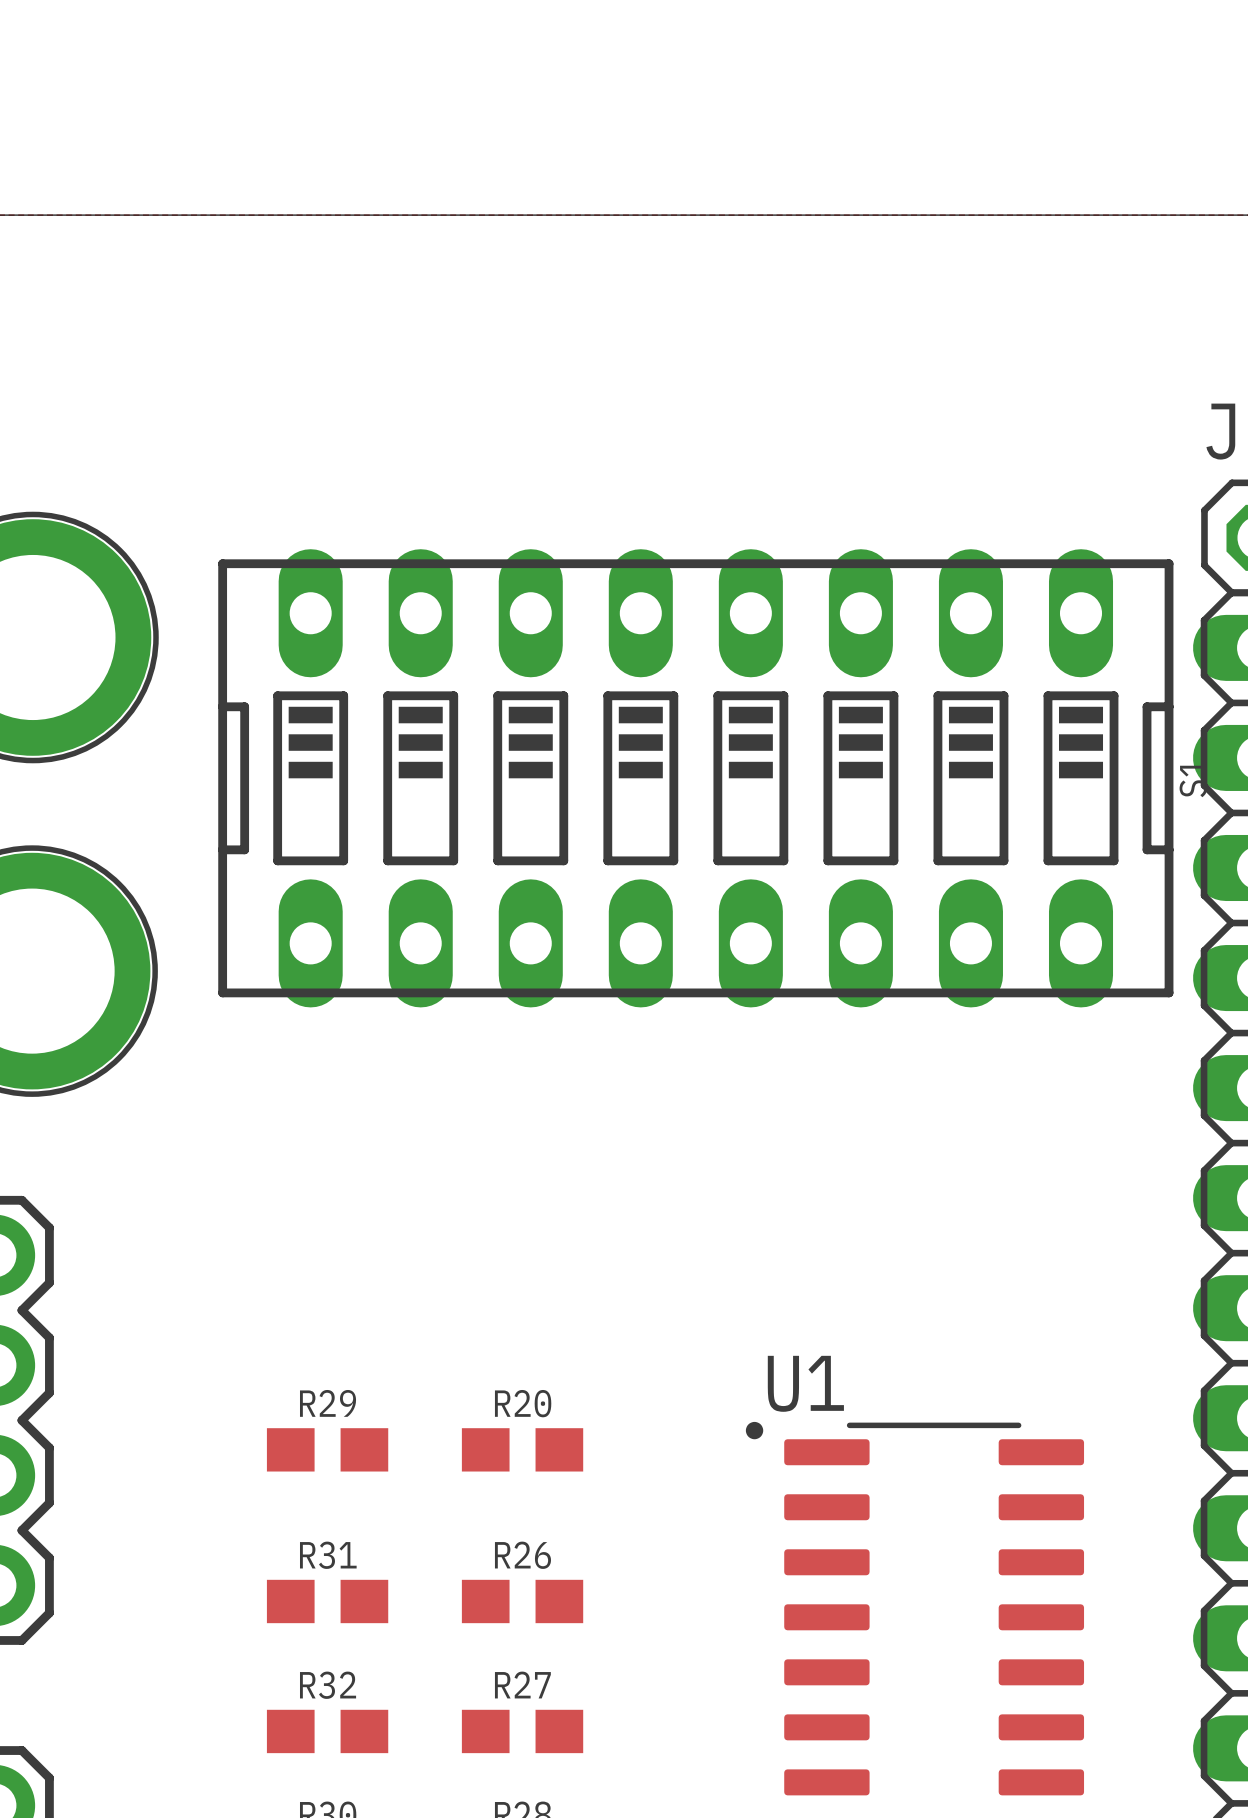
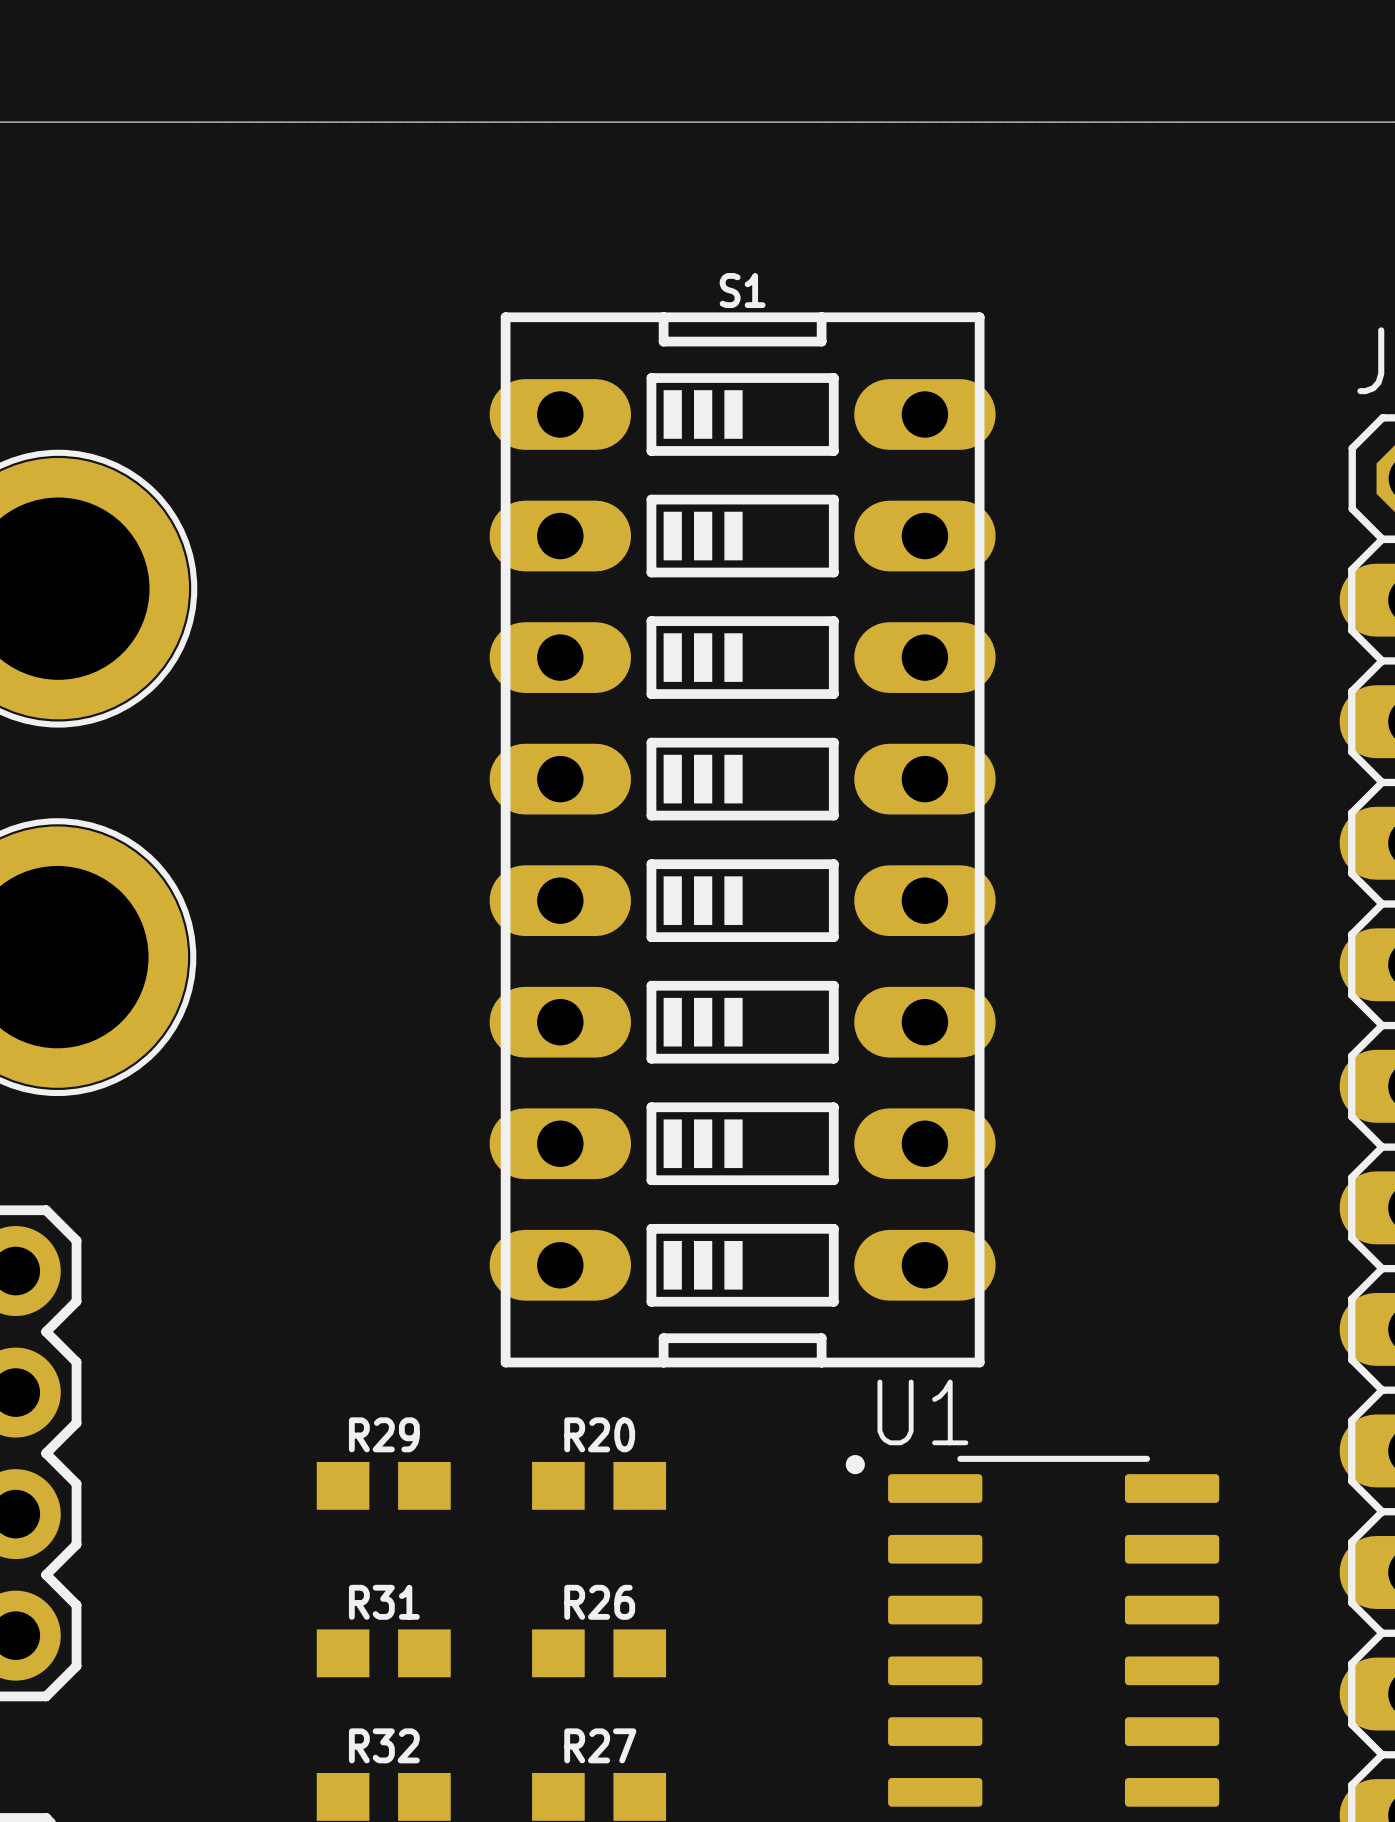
S1 rotation: 0° (695, 778) -> 90° counterclockwise (742, 839)

